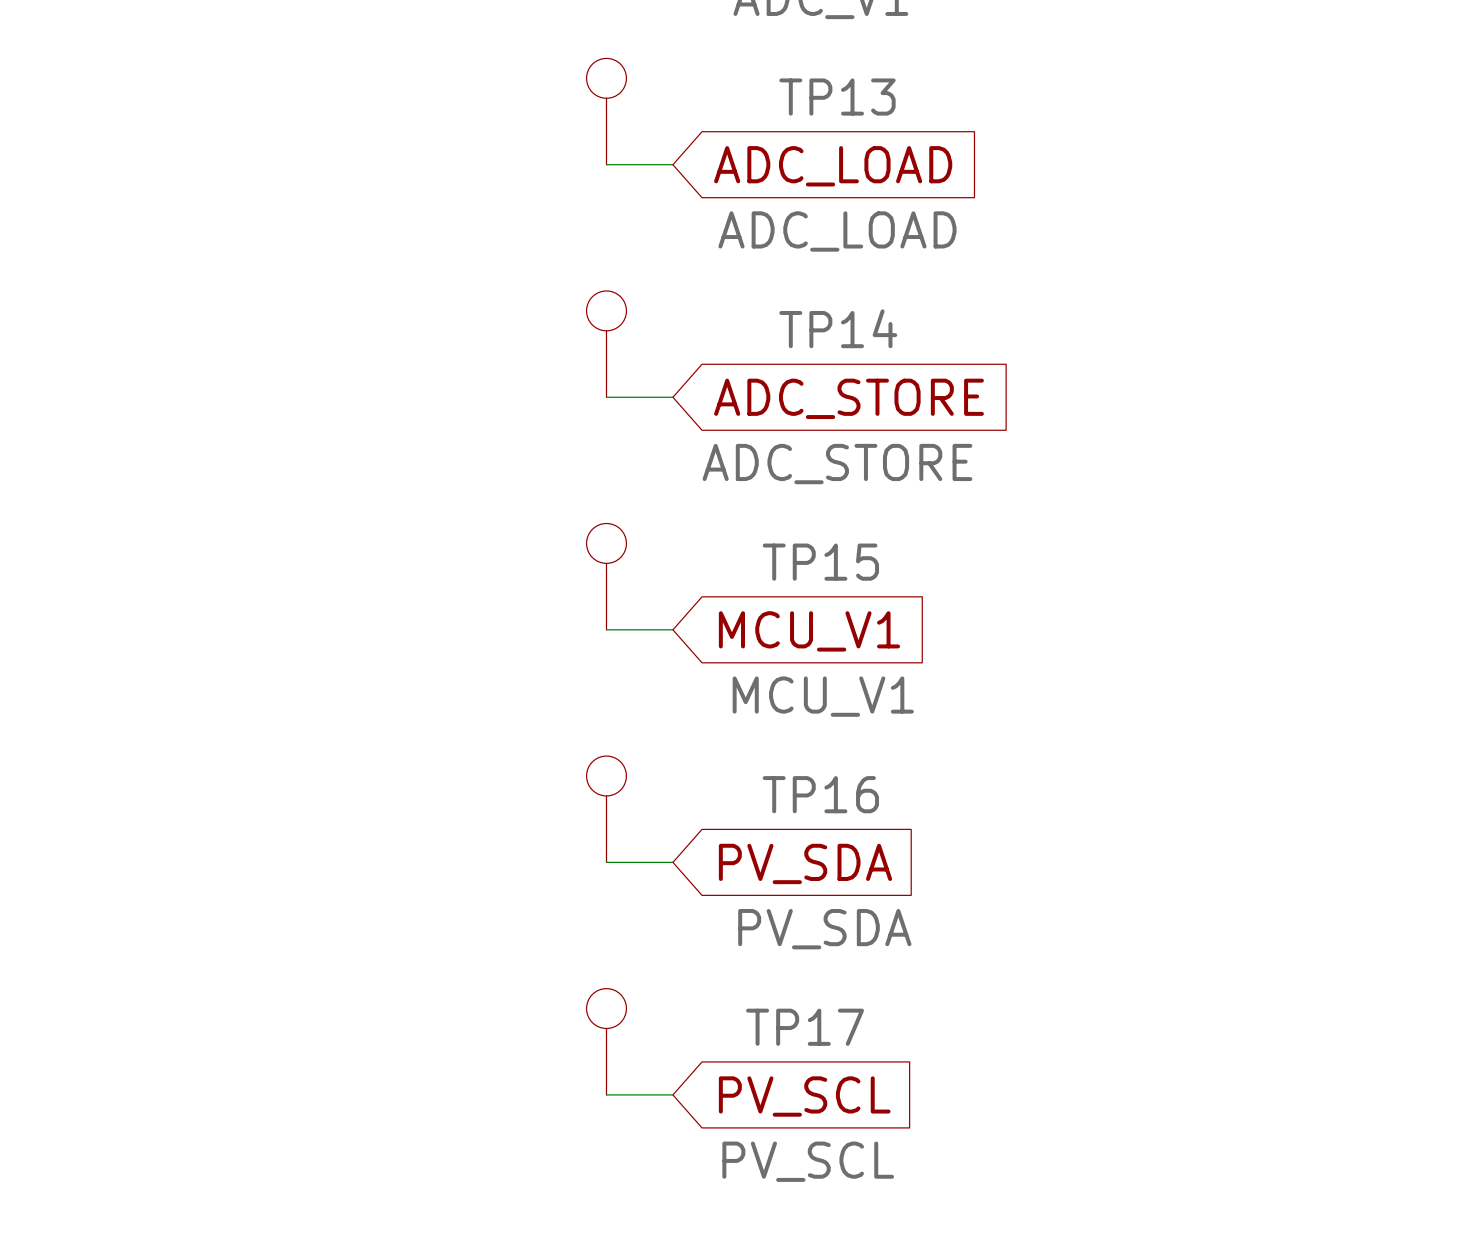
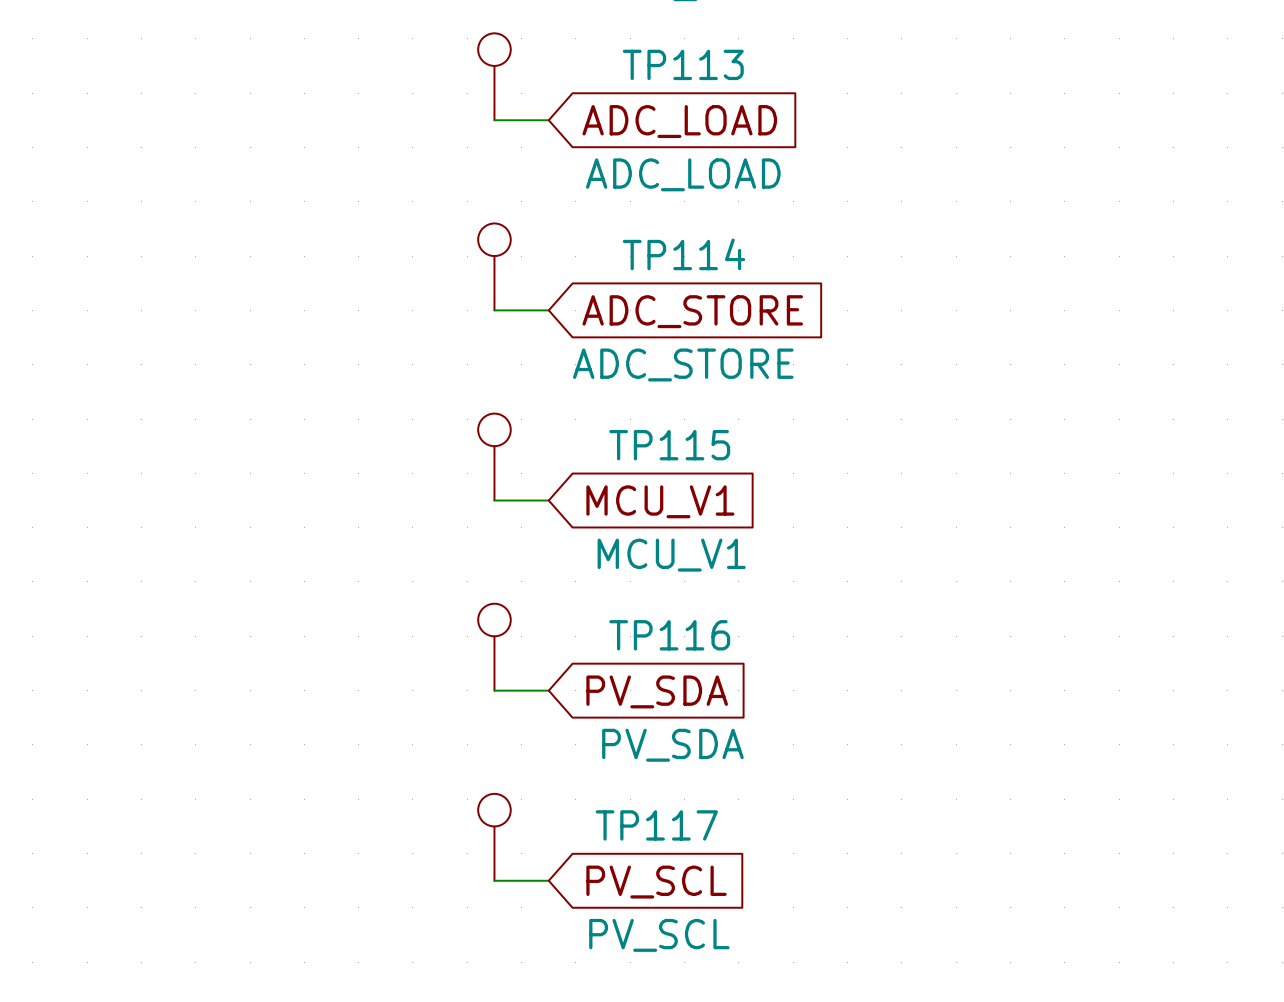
TP13 name: TP13 (837, 97) -> TP113 (683, 64)
TP14 name: TP14 (838, 328) -> TP114 (683, 254)
TP15 name: TP15 (820, 562) -> TP115 (669, 445)
TP16 name: TP16 (820, 794) -> TP116 (669, 635)
TP17 name: TP17 (805, 1027) -> TP117 (656, 825)

